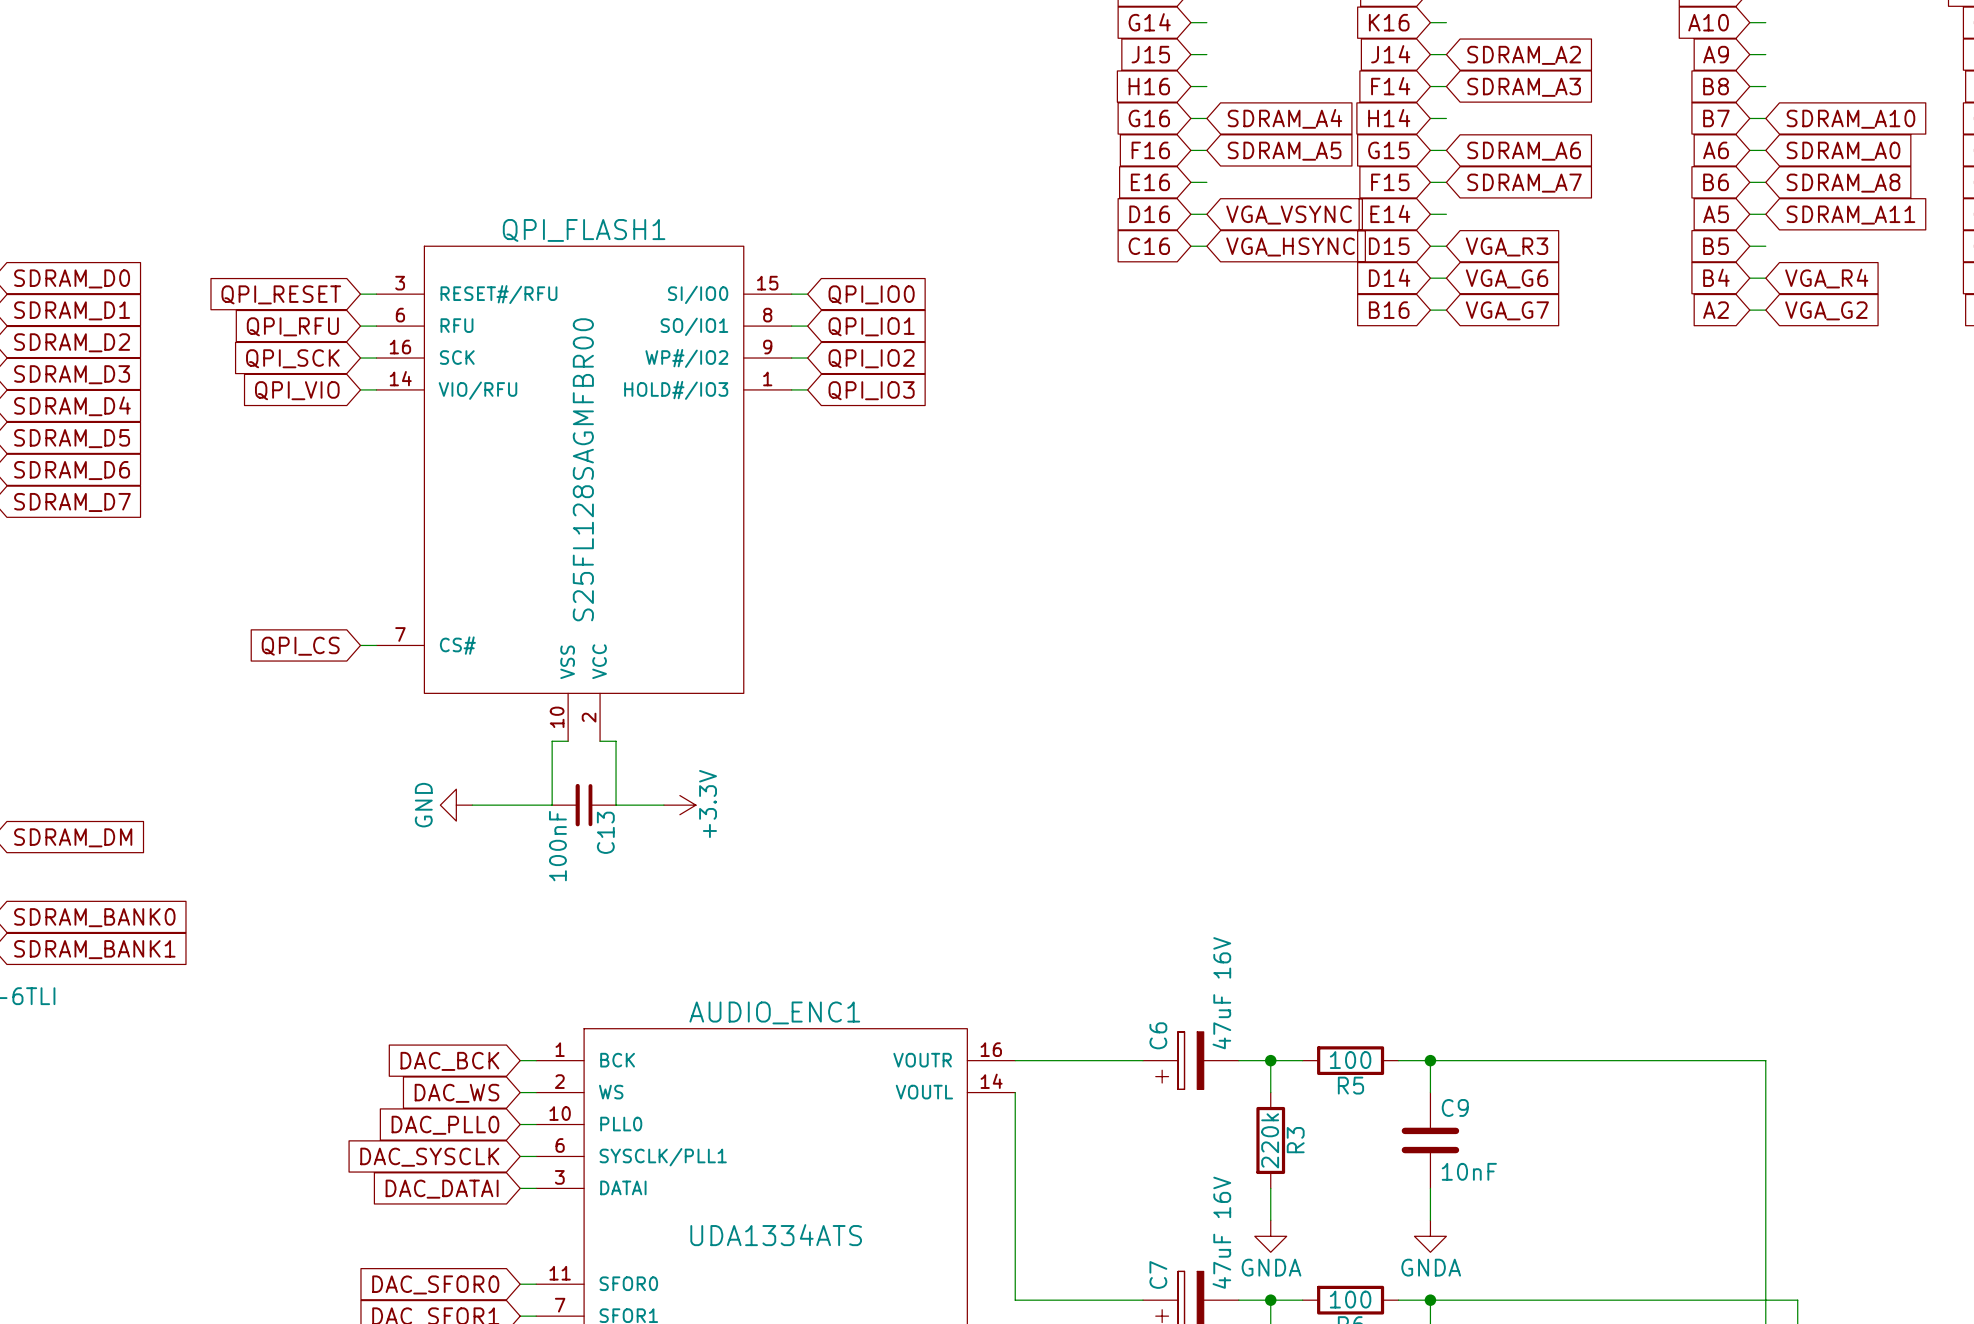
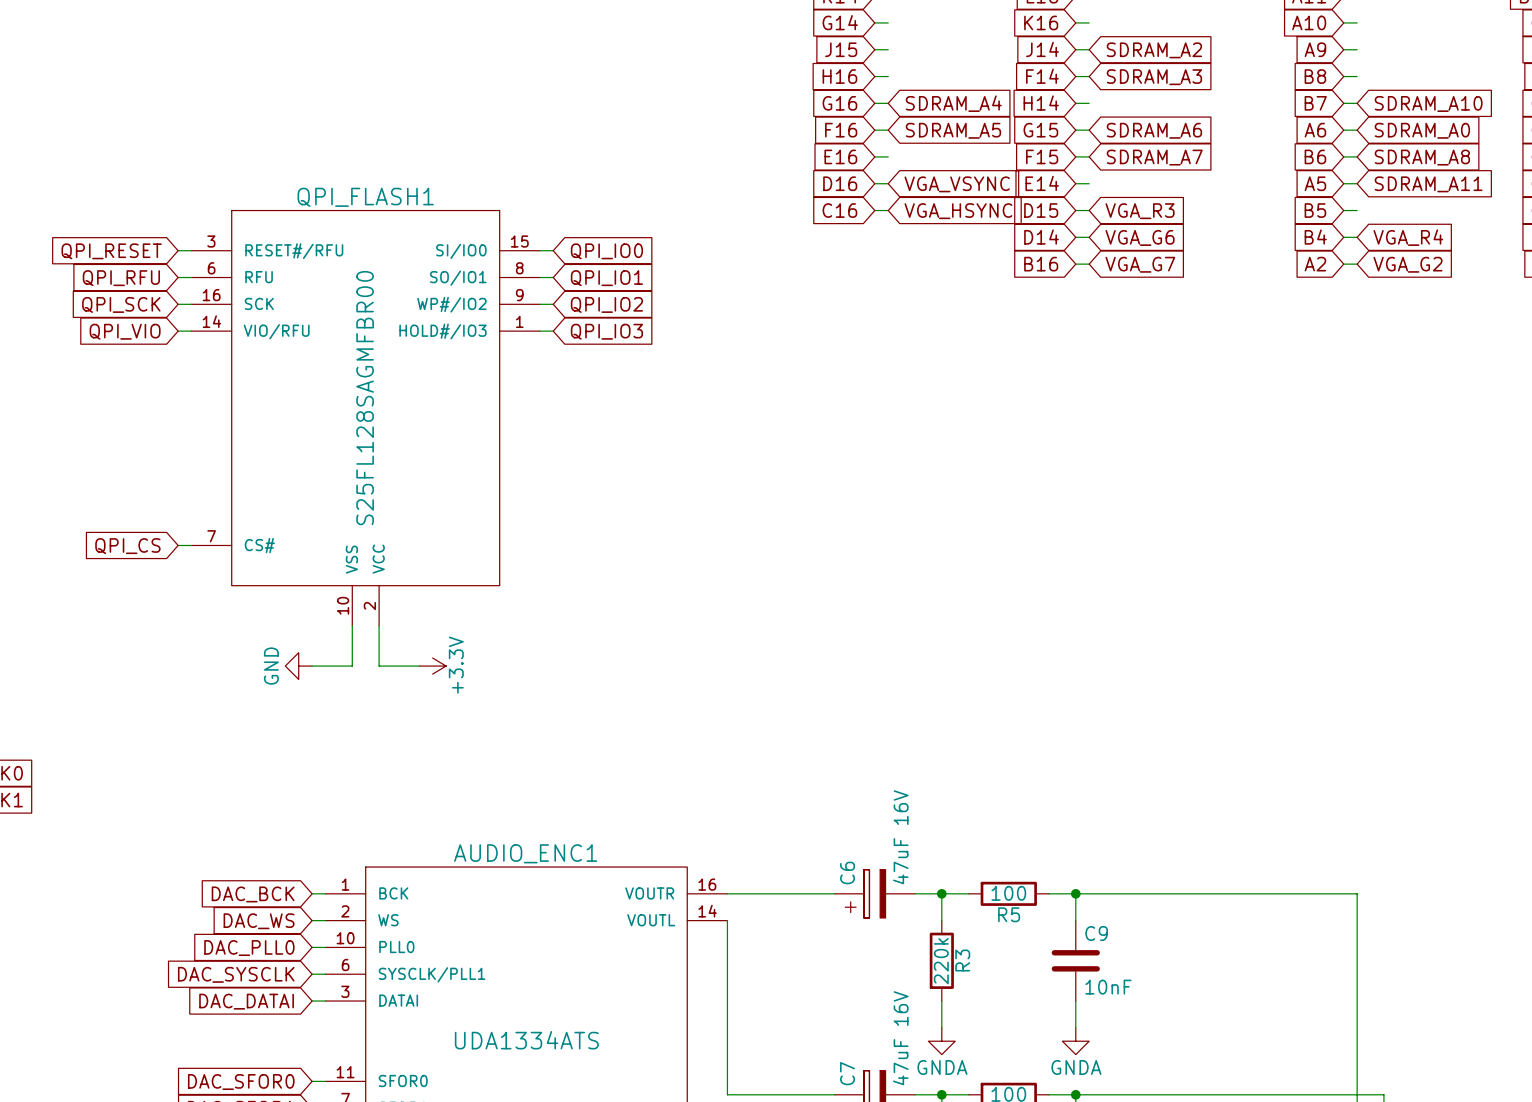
wire: (568, 741) (552, 741) (552, 805) (472, 805) -> (352, 625) (352, 666) (312, 666)
wire: (600, 741) (616, 741) (616, 805) (663, 805) -> (379, 625) (379, 666) (419, 666)
power symbol position: GND (456, 805) -> GND (298, 666)
C13: 100nF (584, 805) -> none
power symbol position: +3.3V (679, 805) -> +3.3V (432, 666)

